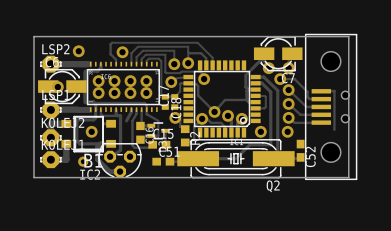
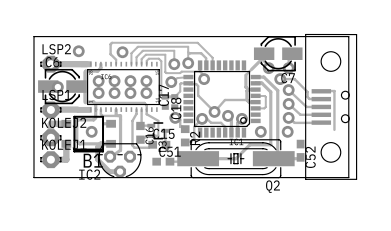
track: (131, 109) (126, 120) -> none
via: (83, 161) -> none

